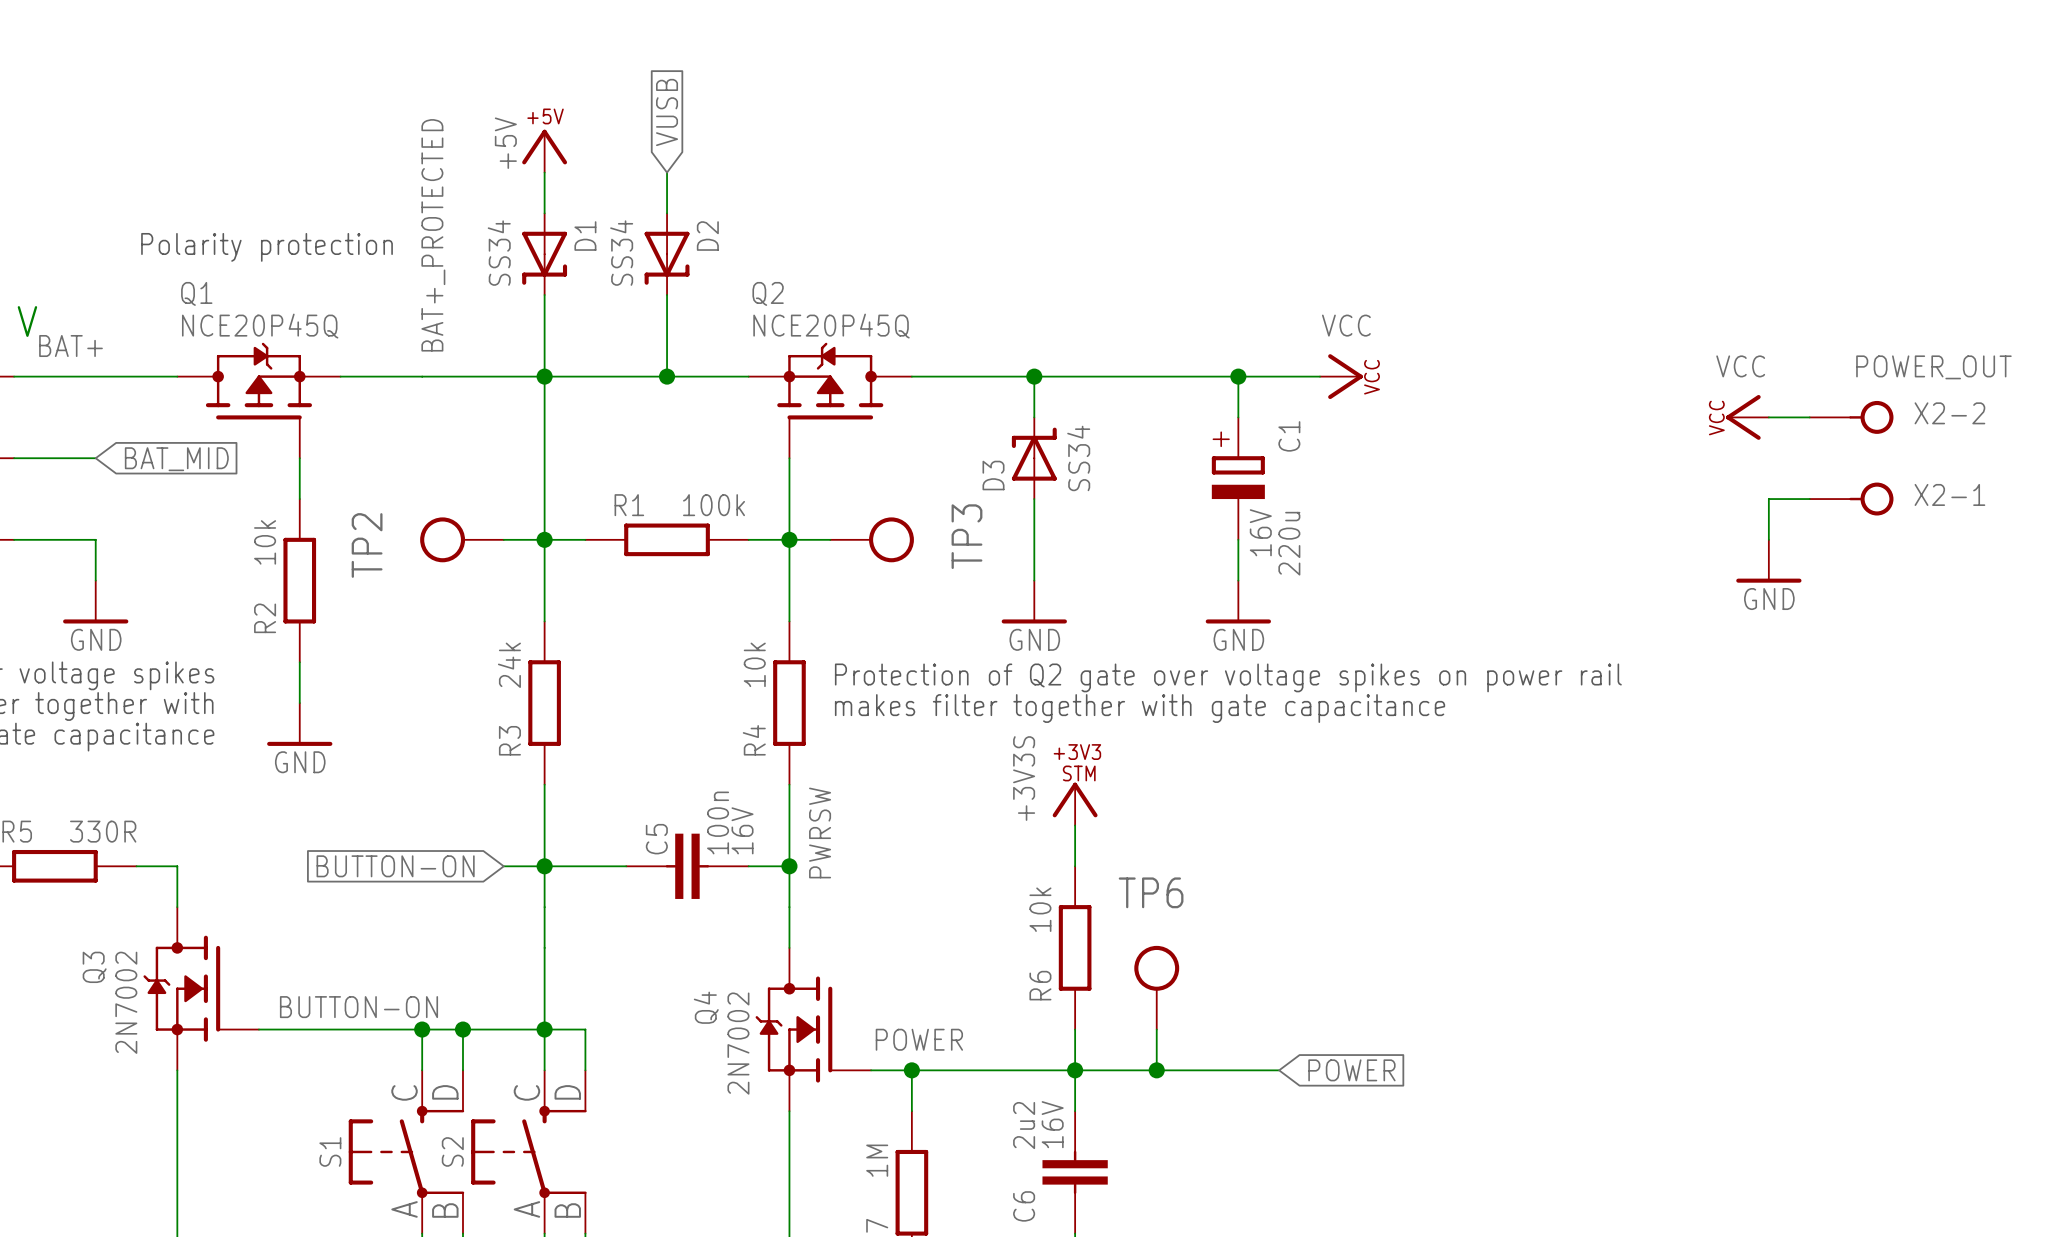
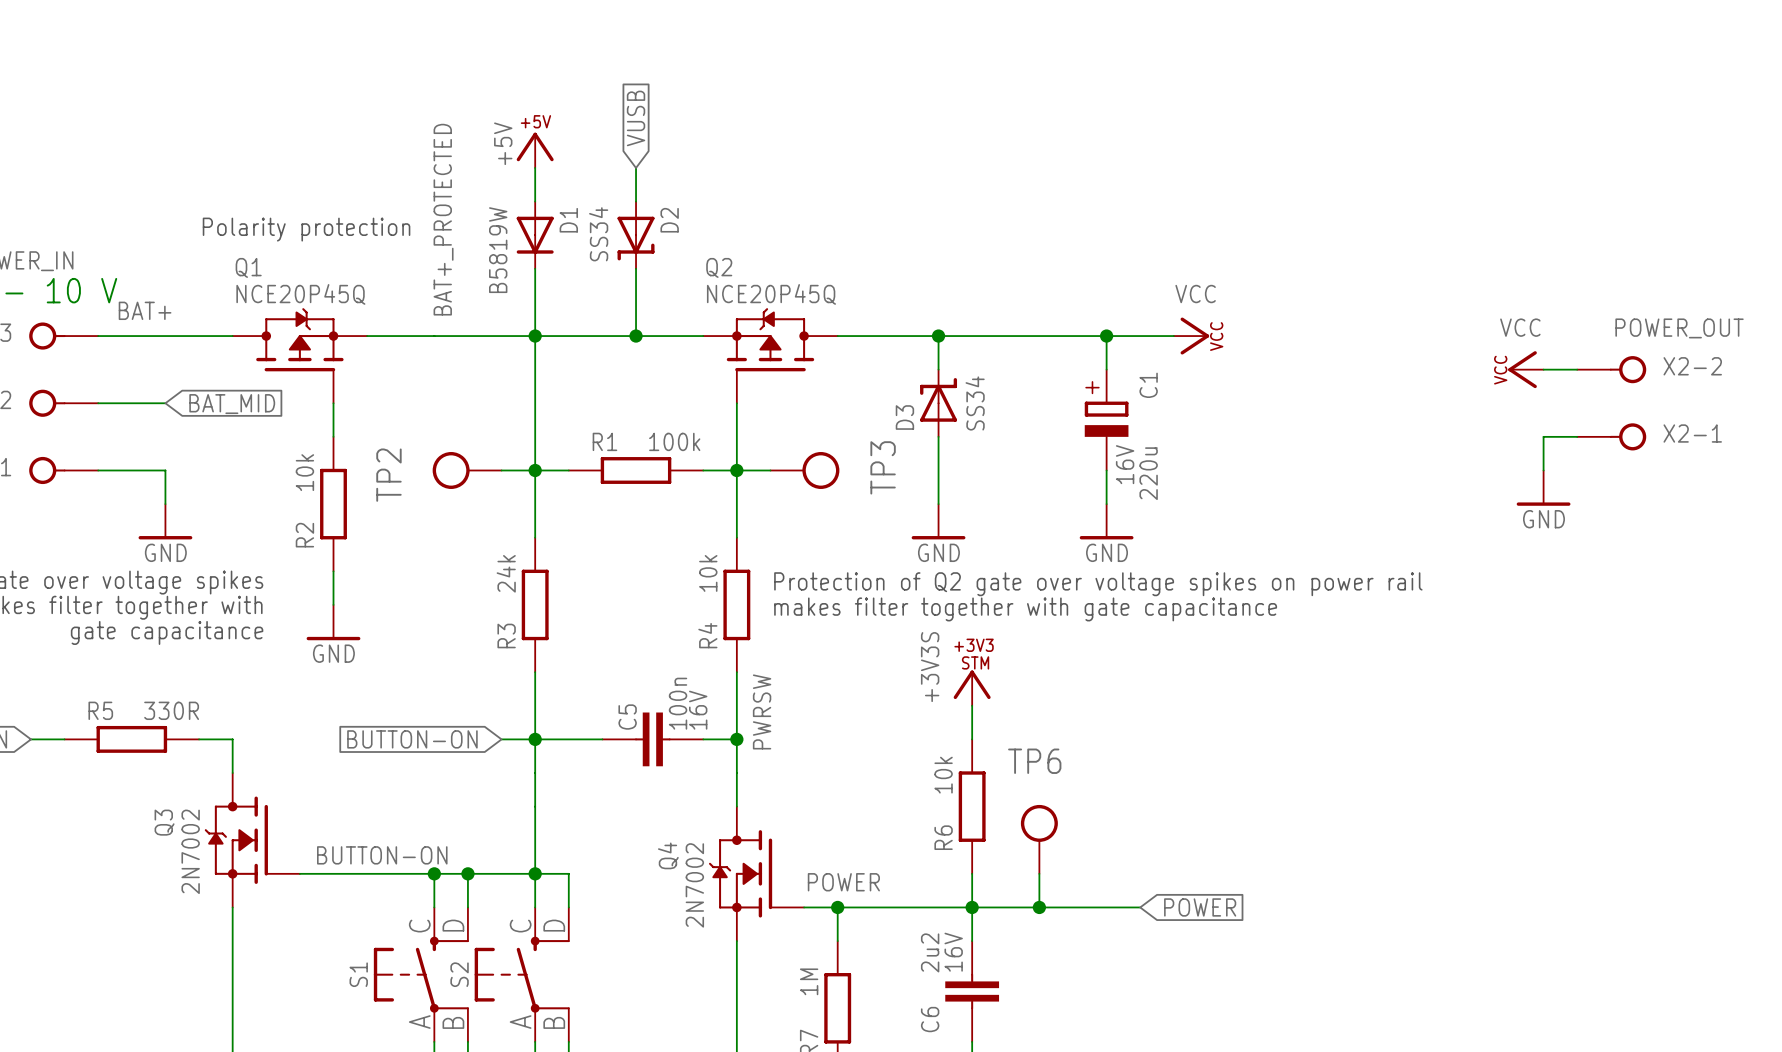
D1 symbol: [522, 213, 568, 295] -> [516, 201, 554, 269]
D1 value: SS34 (499, 253) -> B5819W (498, 250)

